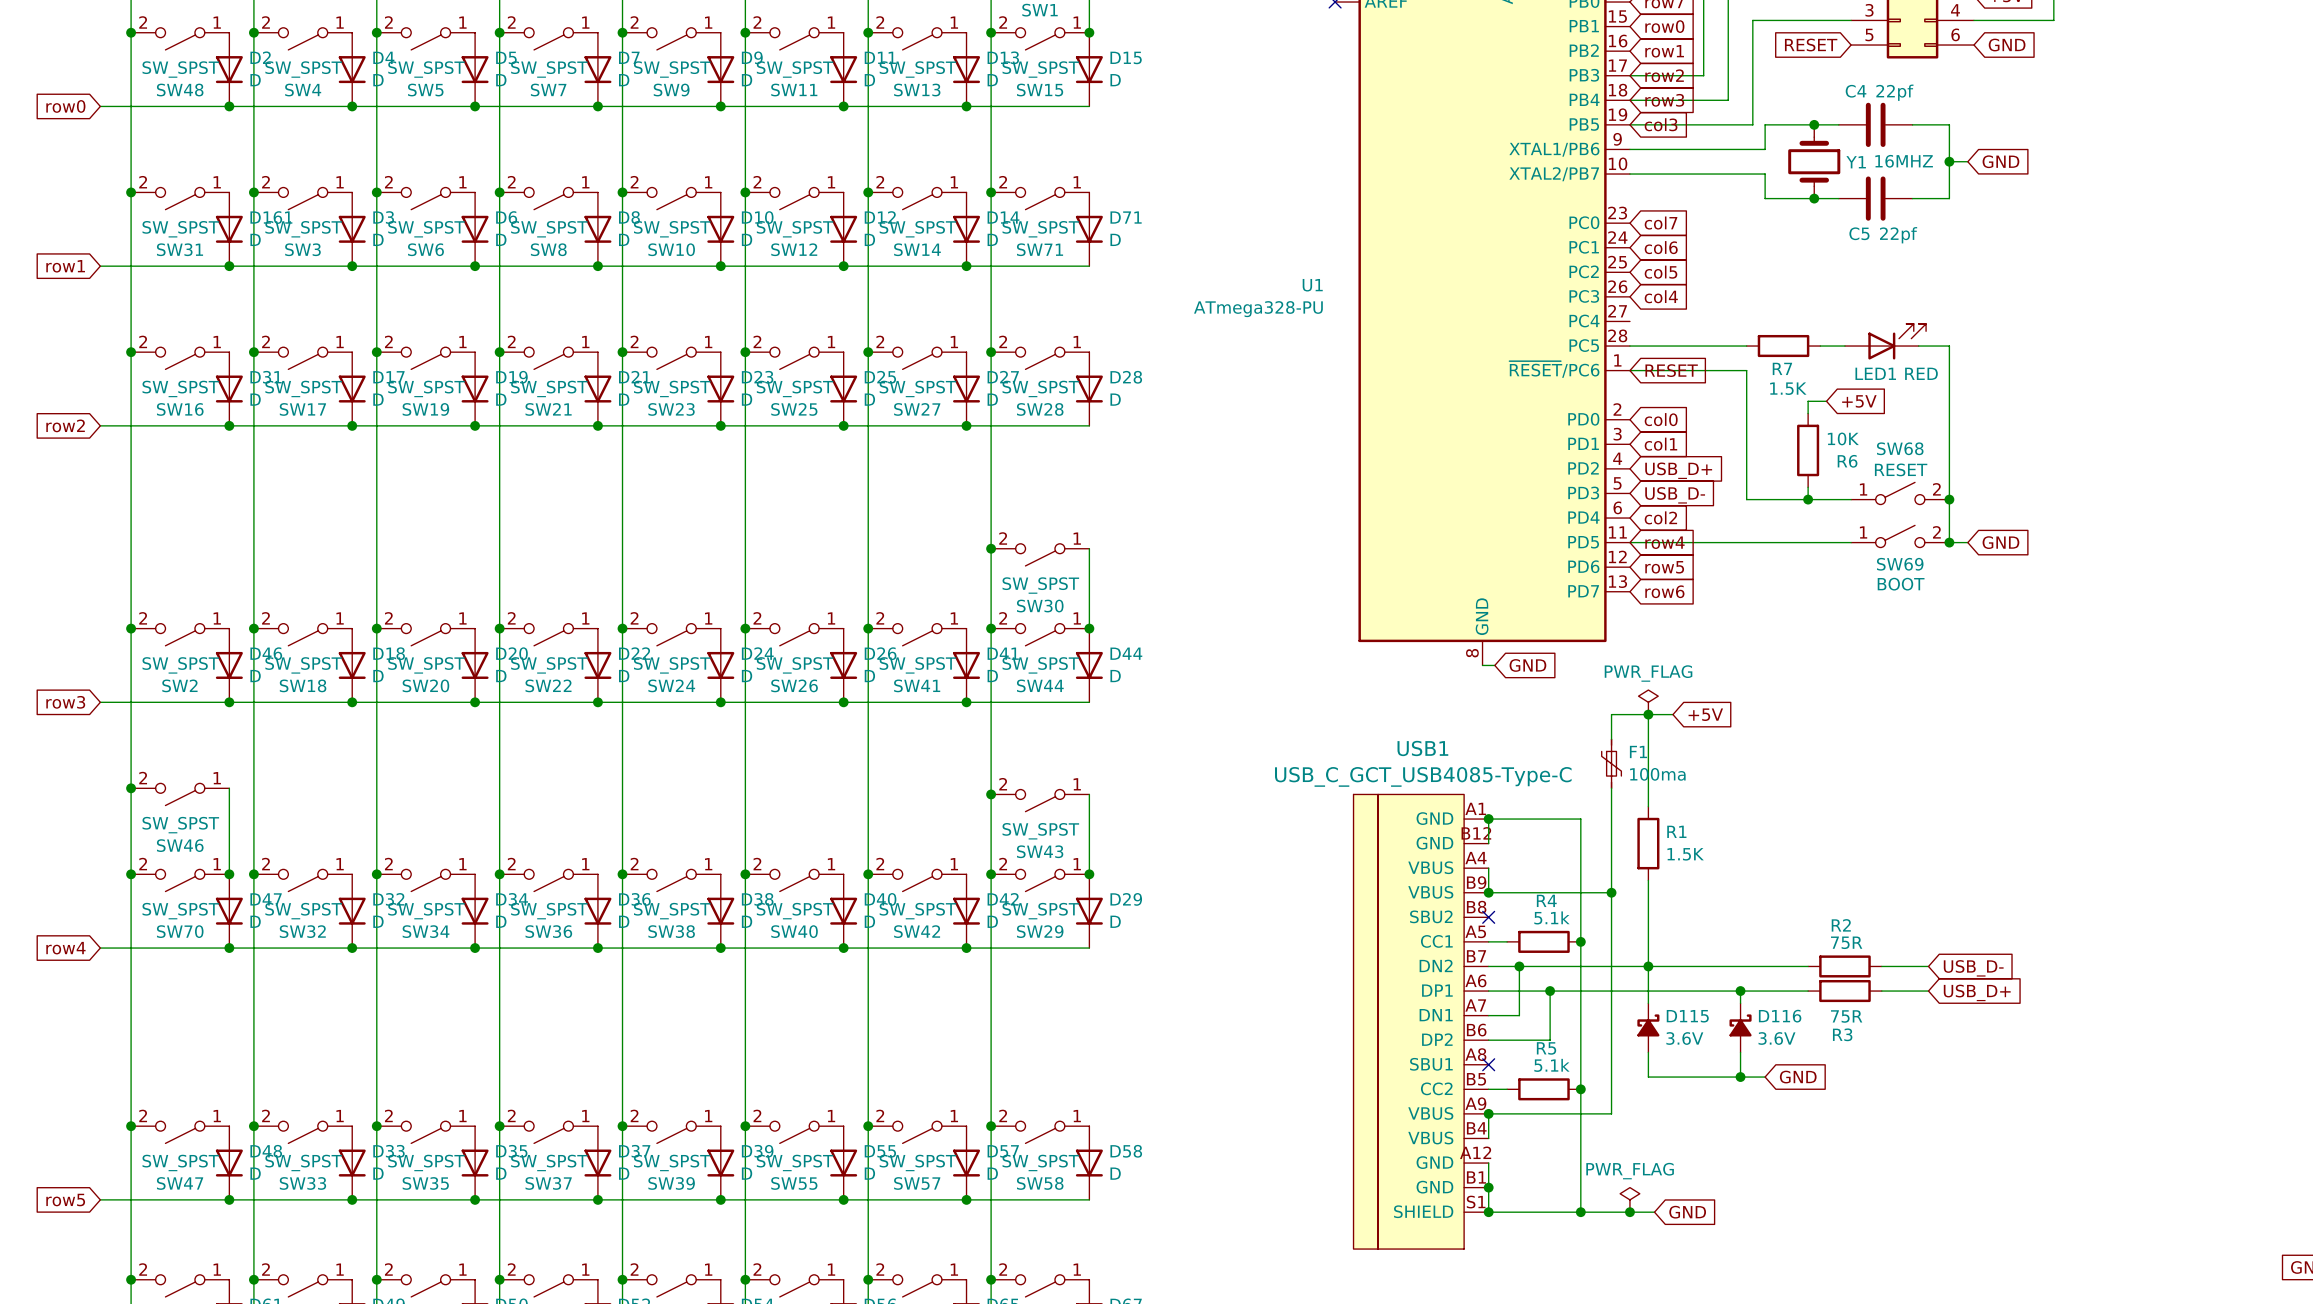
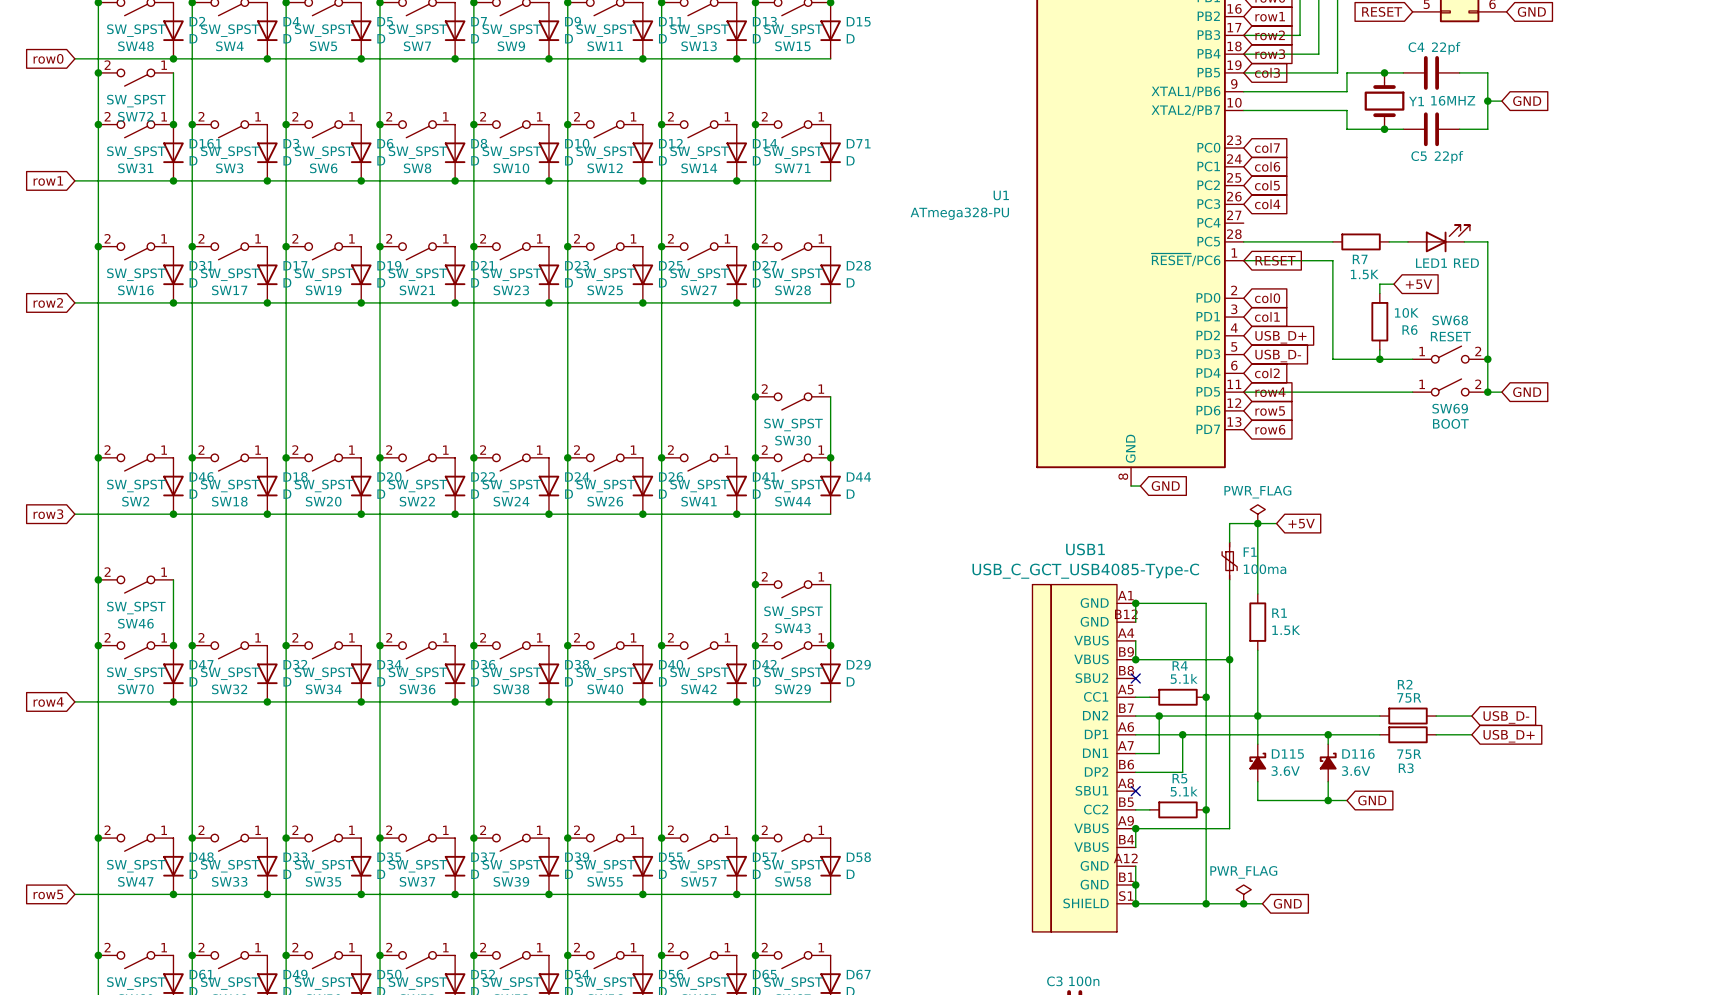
junction: none -> (98, 72)
wire: none -> (173, 72) (173, 124)
SW72: none -> SW_SPST (135, 77)
junction: none -> (173, 124)

